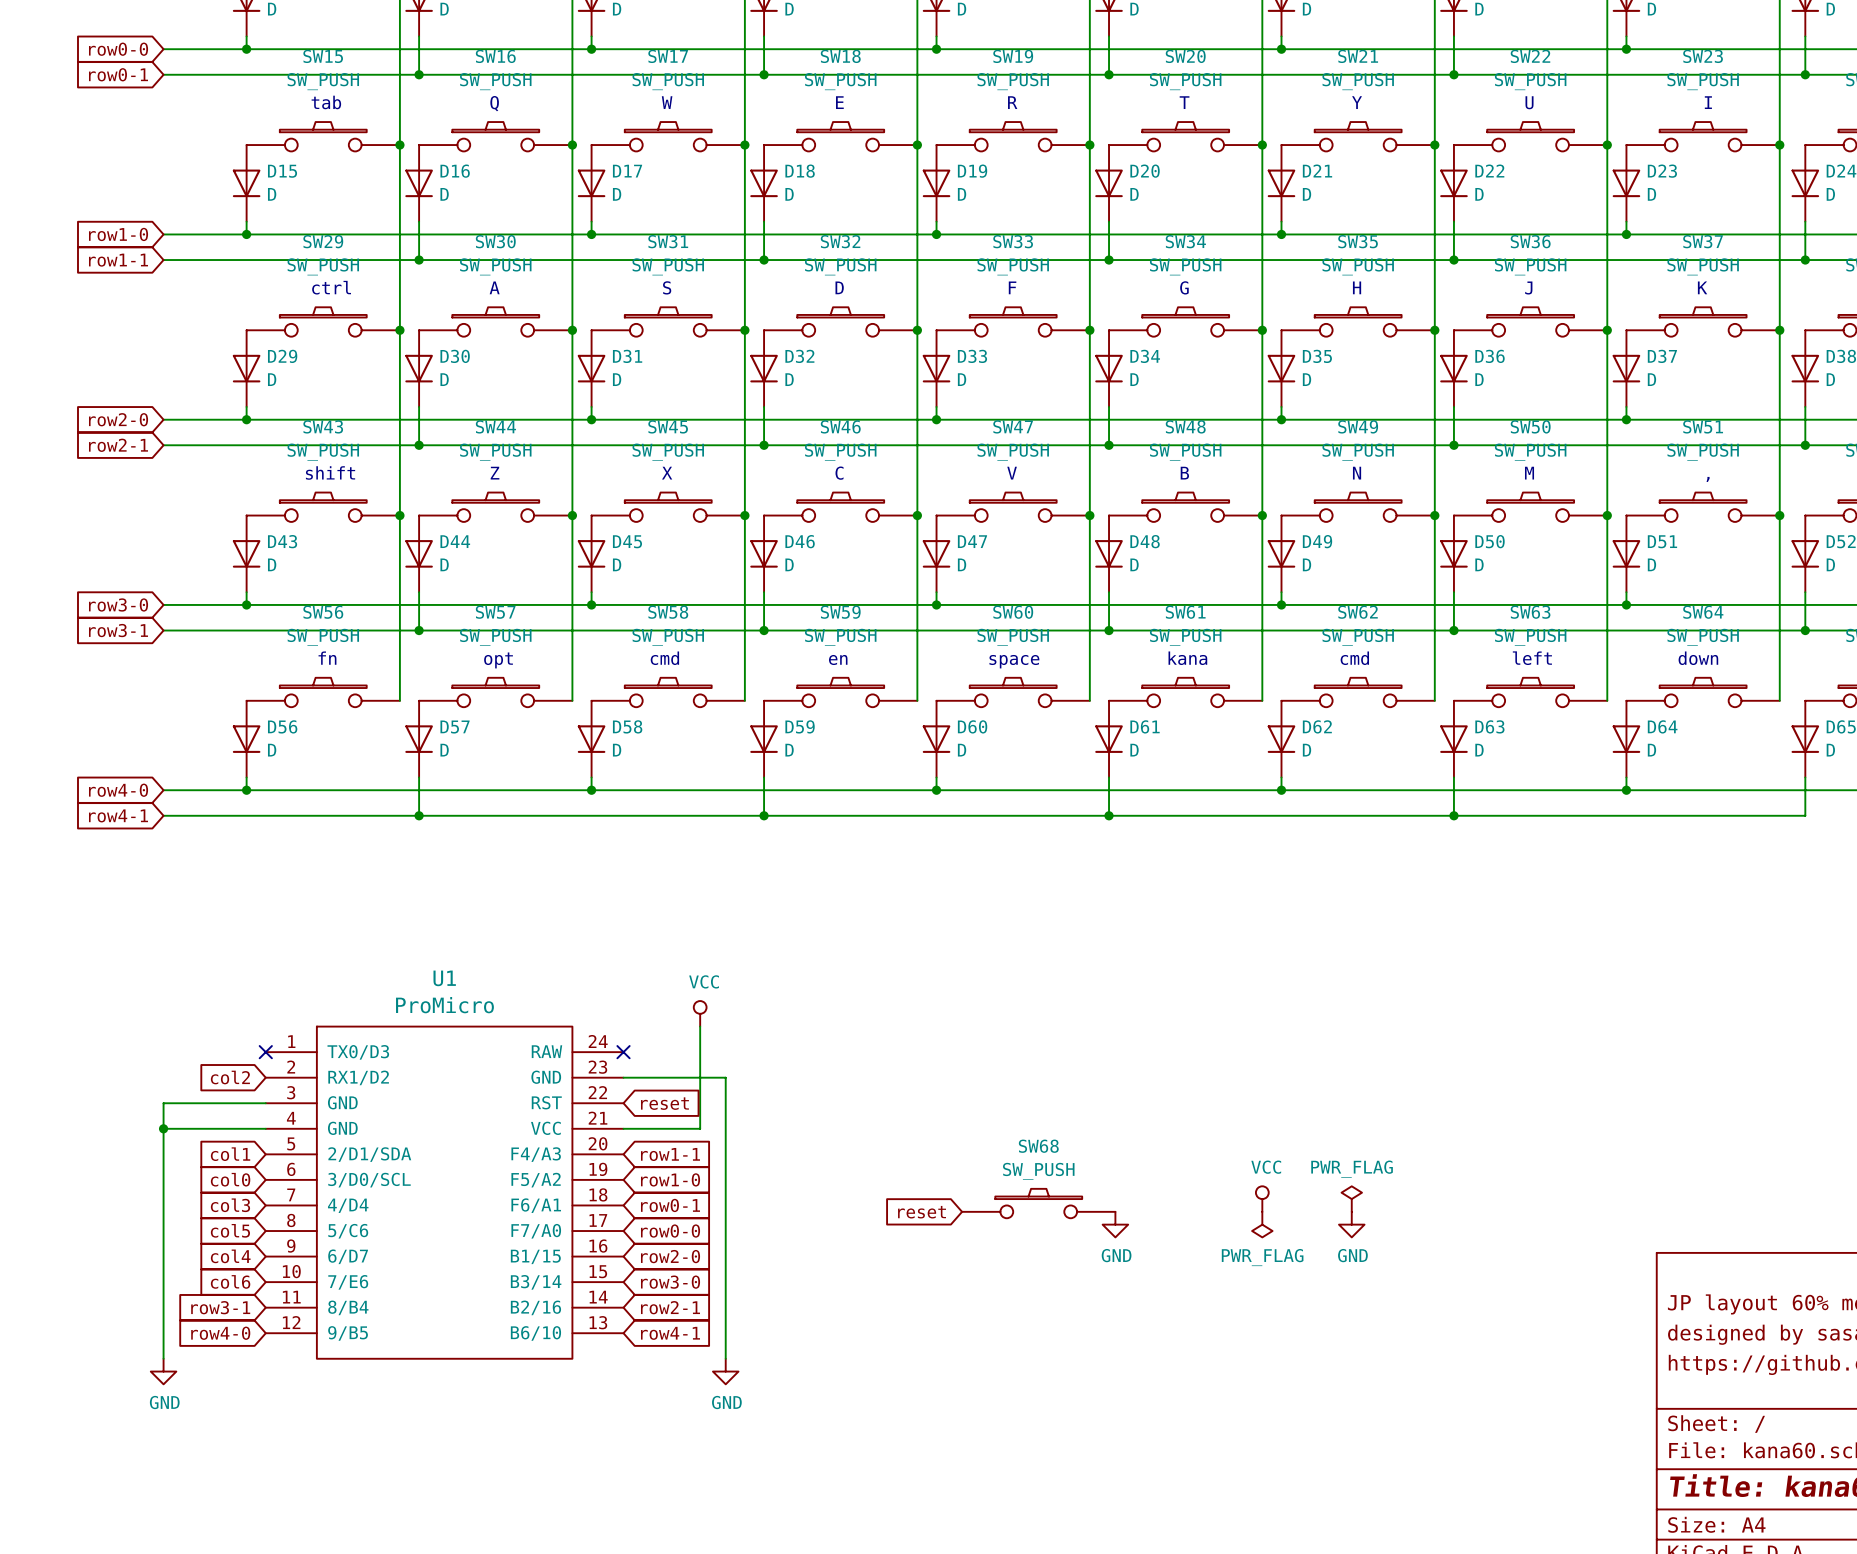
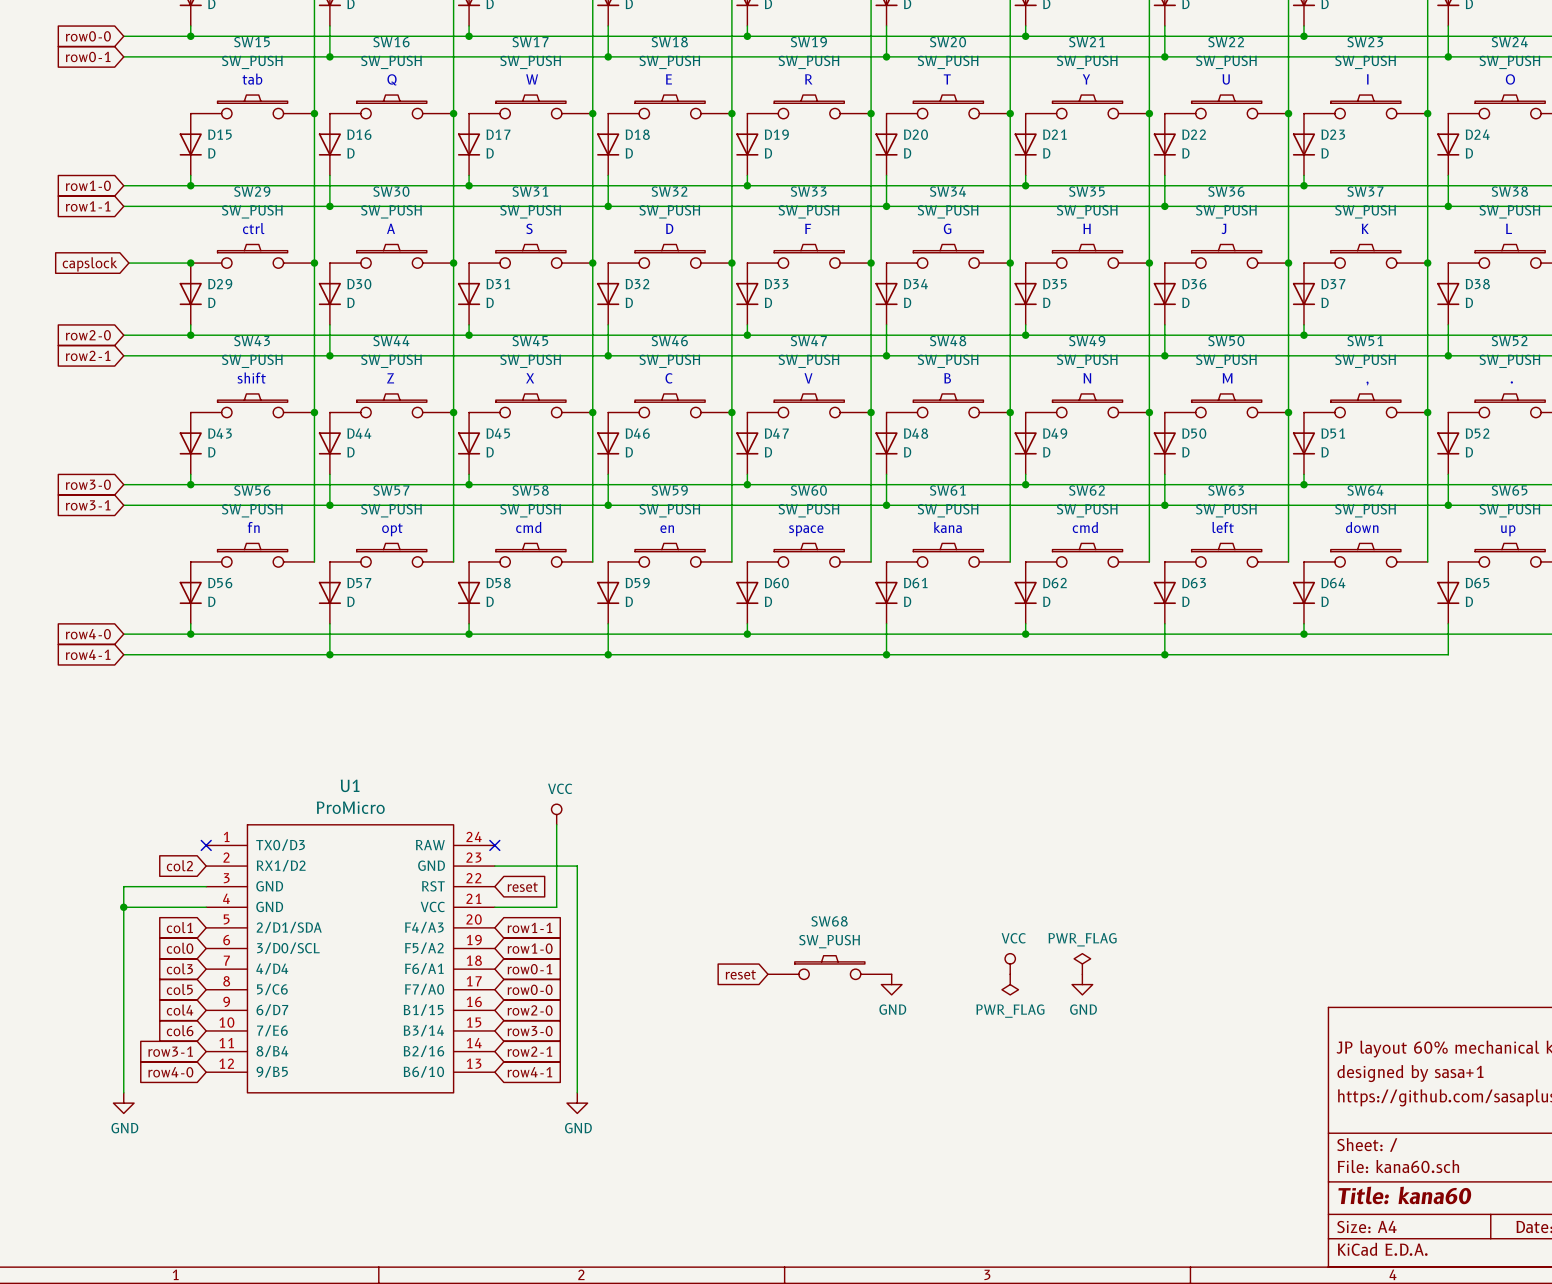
wire: none -> (128, 263) (190, 263)
junction: none -> (190, 263)
global label: none -> capslock (90, 264)

